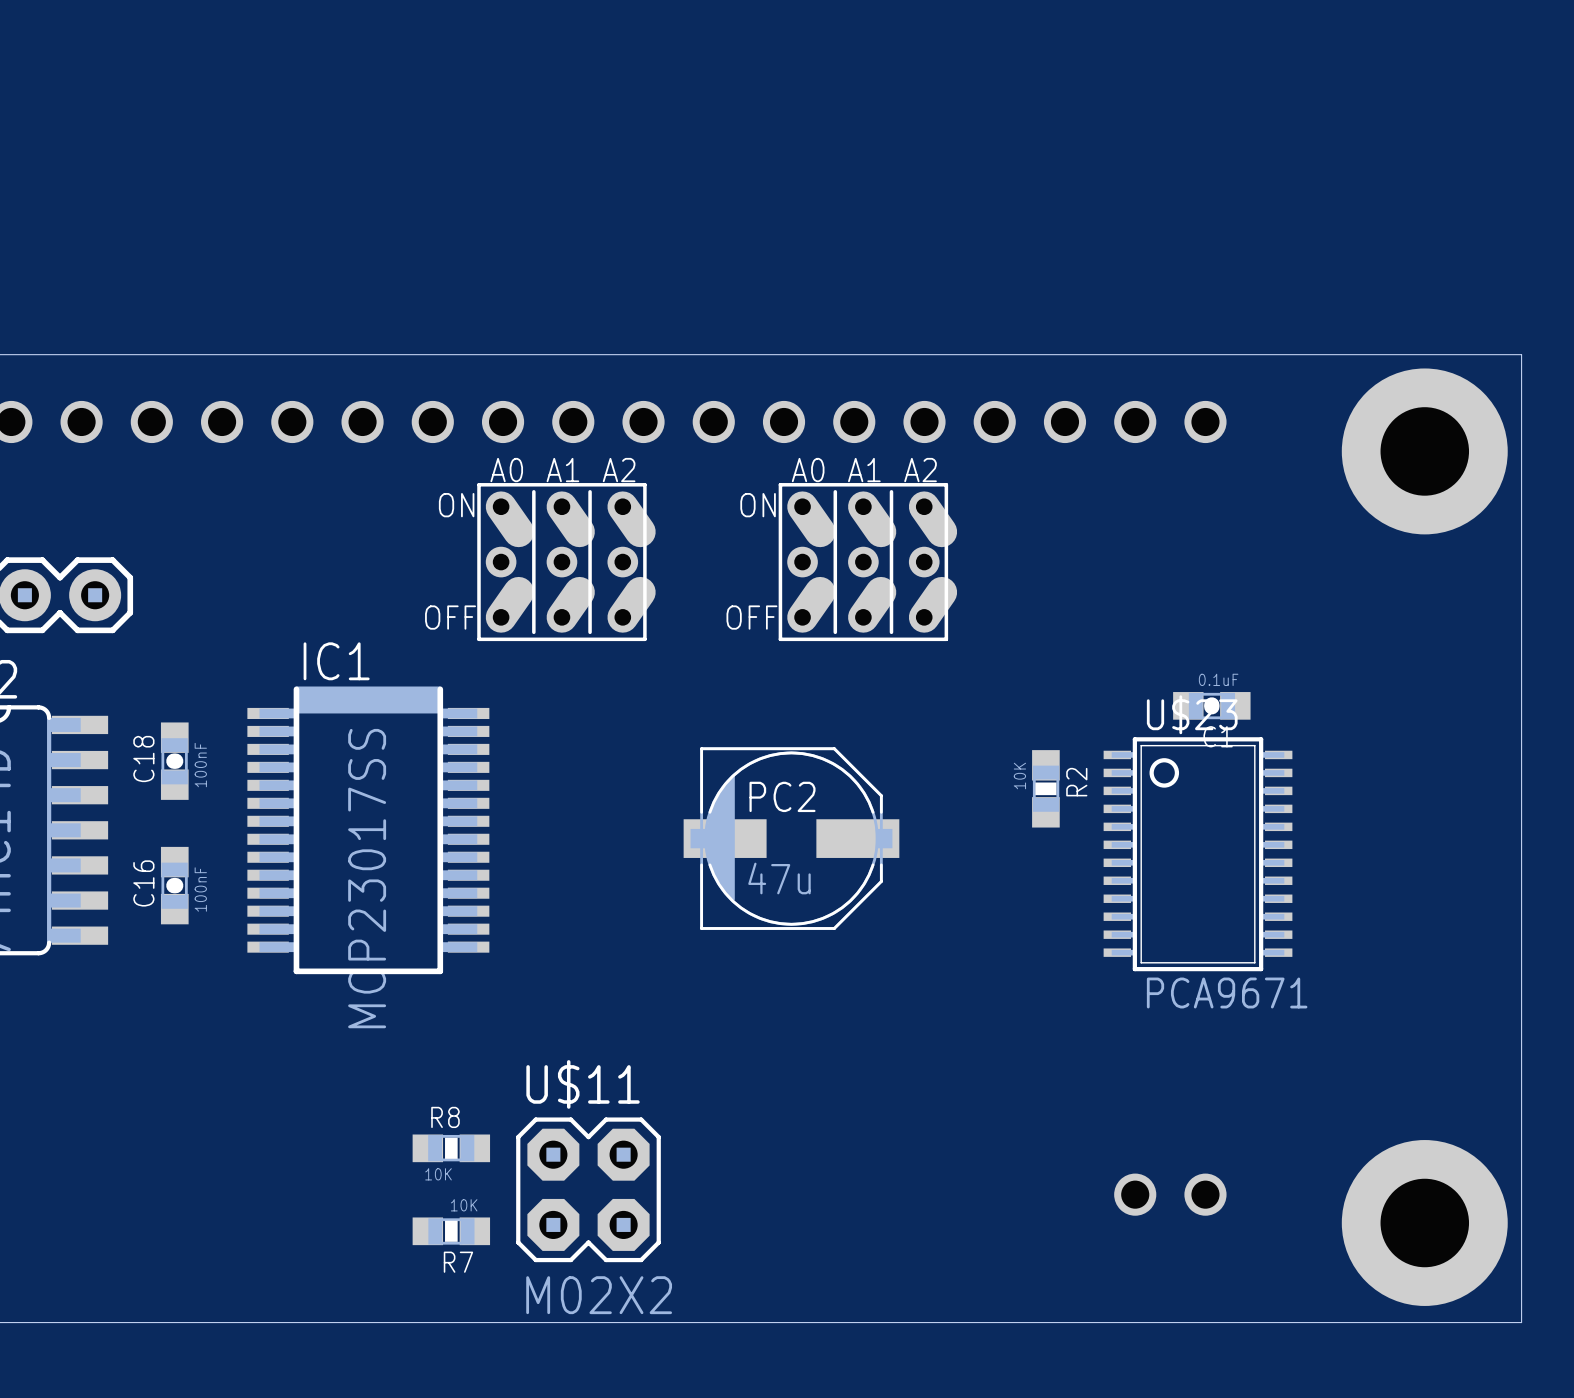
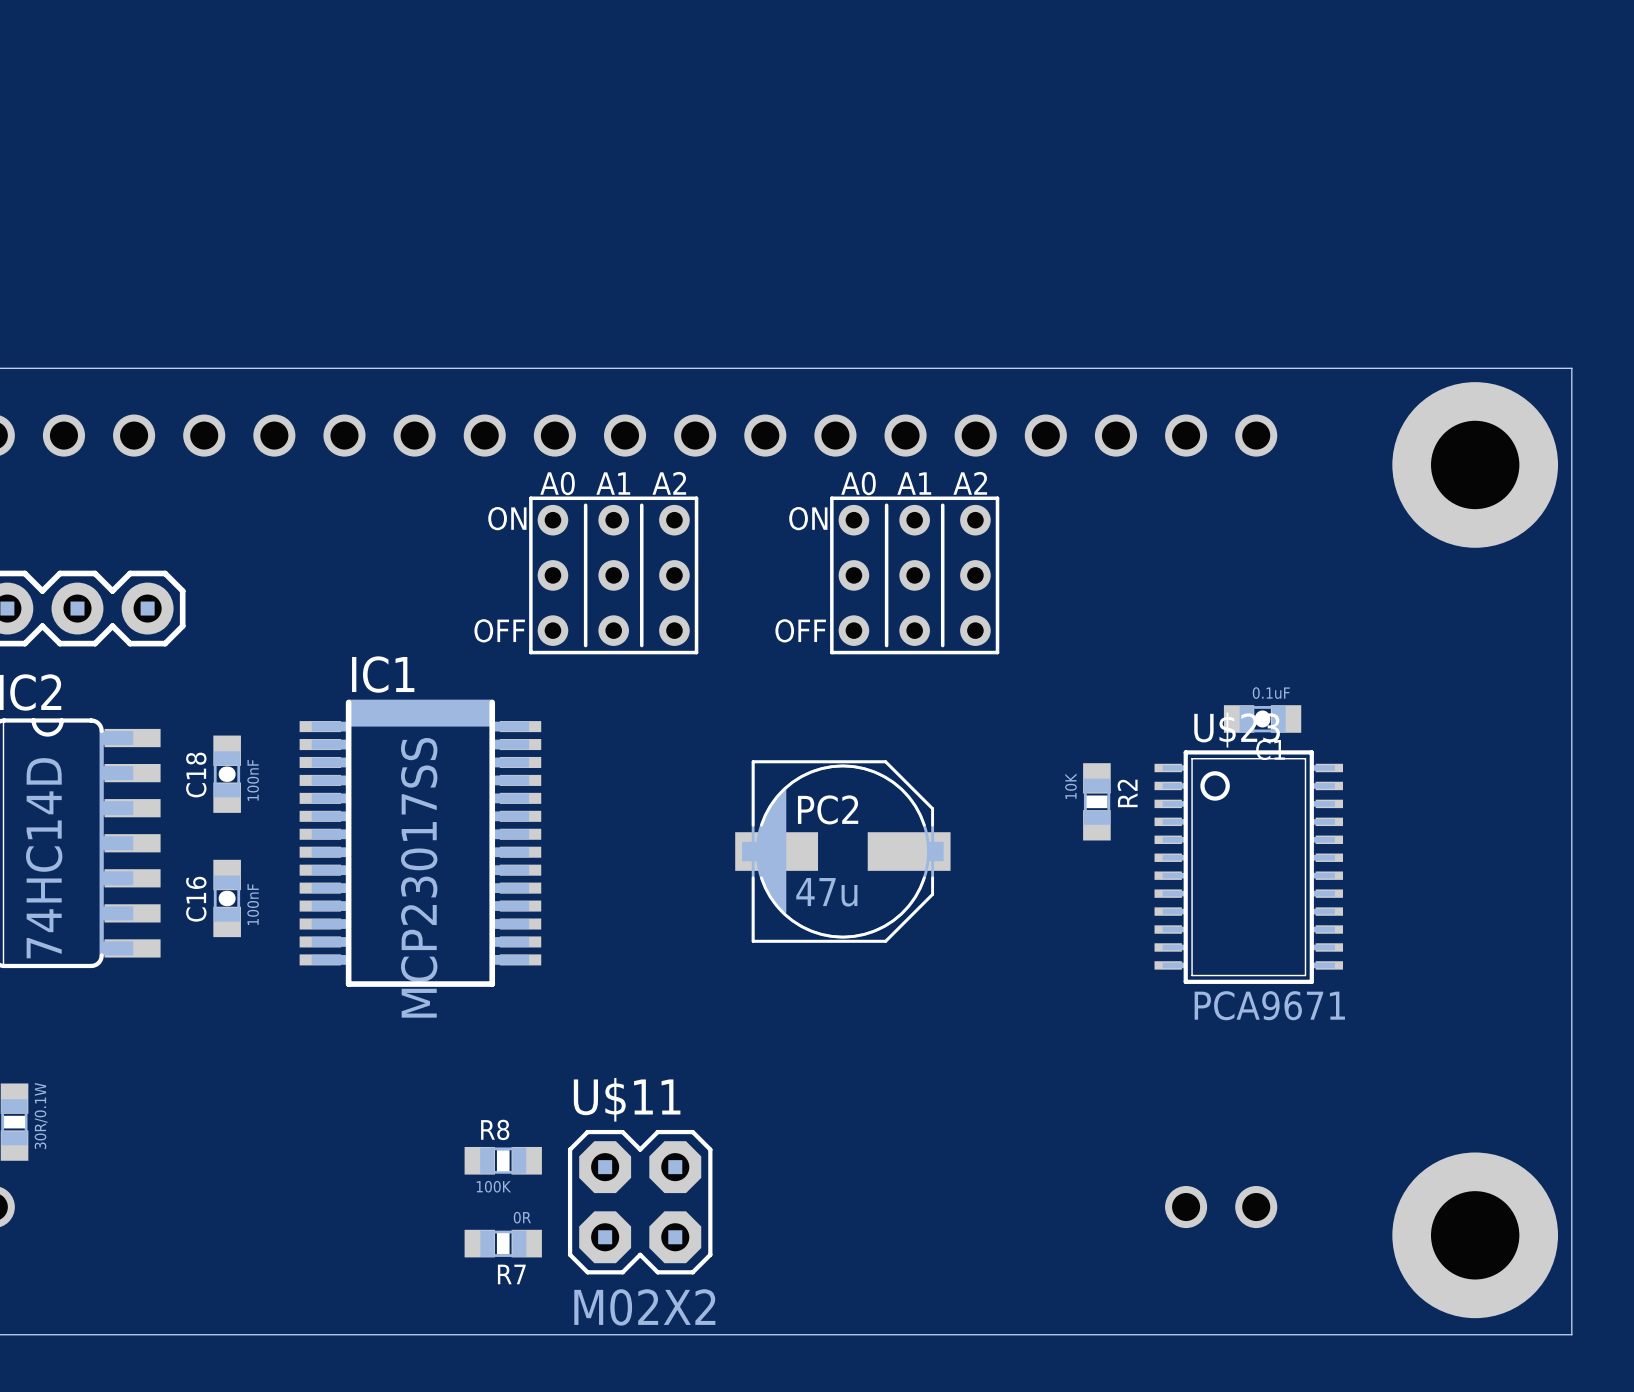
part footprint: [477, 483, 656, 642] -> [529, 496, 699, 655]
part footprint: [778, 483, 958, 642] -> [830, 496, 1000, 655]
R8 value: 10K (438, 1174) -> 100K (493, 1186)
R7 value: 10K (464, 1205) -> 0R (522, 1217)

